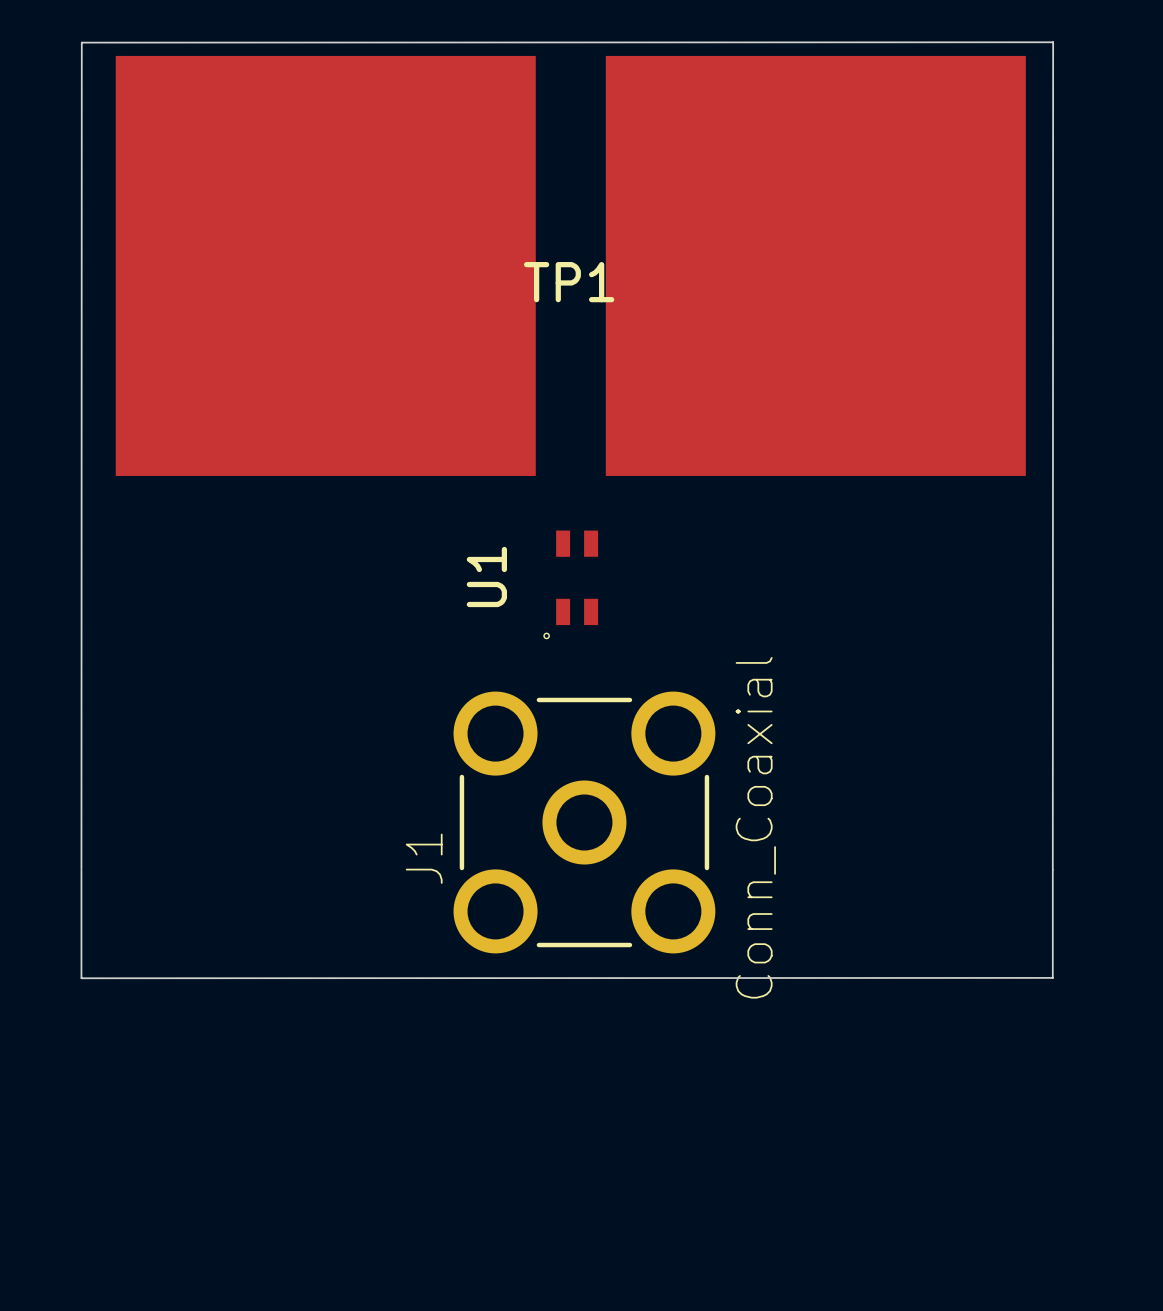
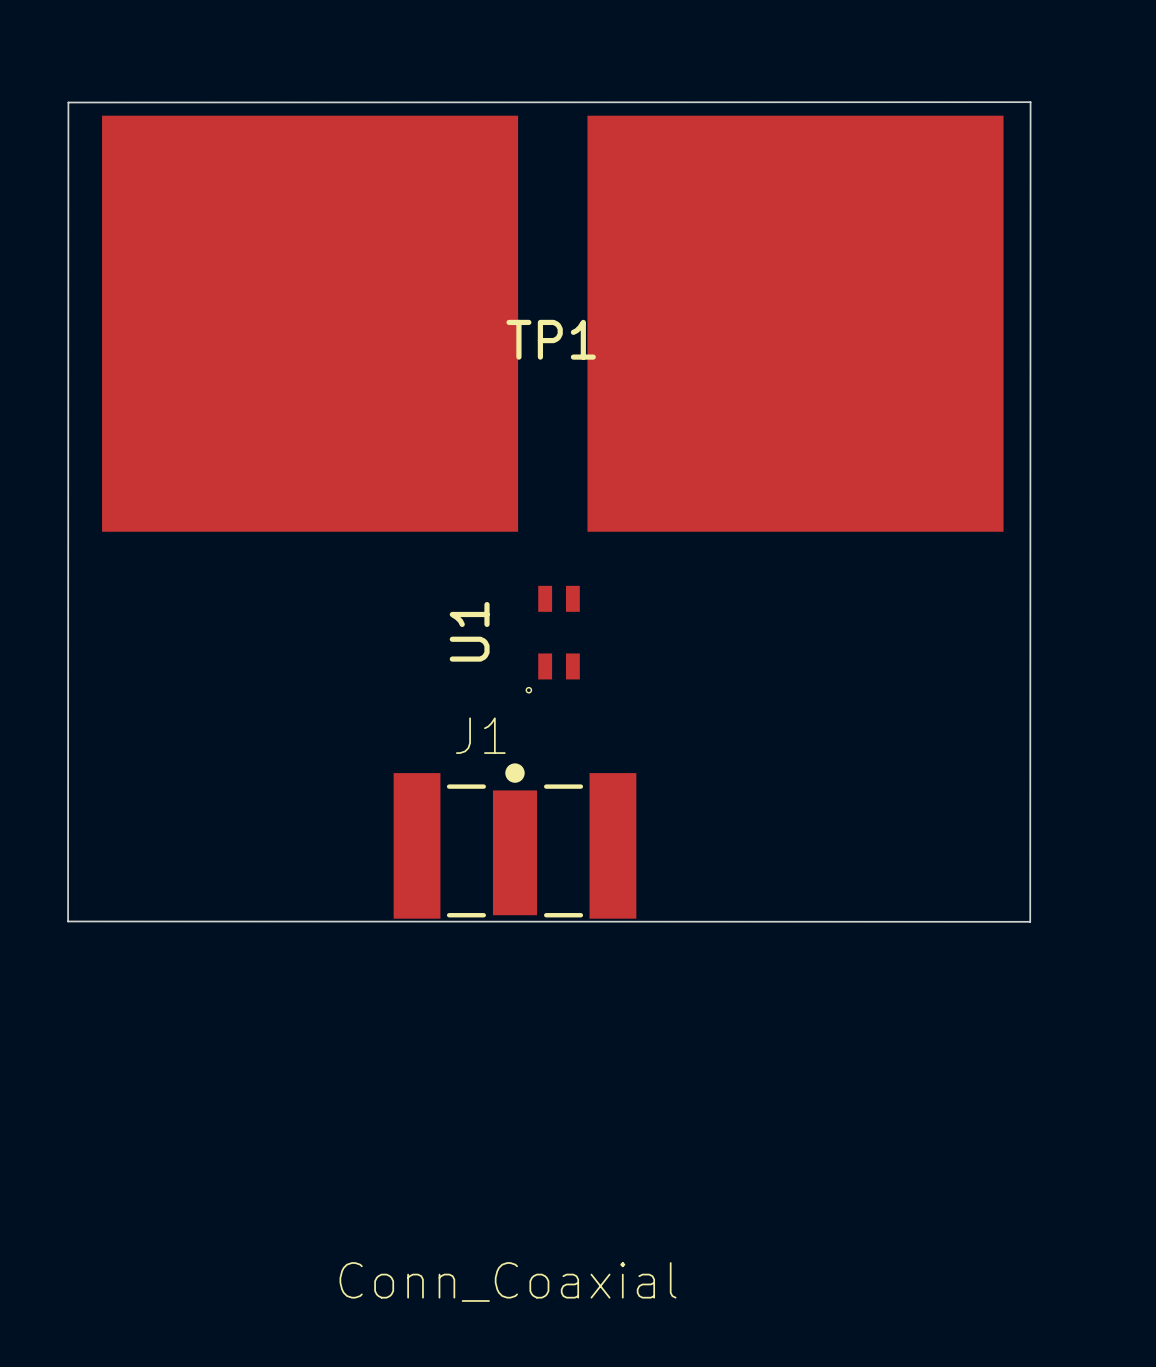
J1 footprint: [453, 691, 716, 954] -> [393, 763, 637, 919]
J1 value position: Conn_Coaxial (755, 827) -> Conn_Coaxial (508, 1281)
J1 name position: J1 (424, 858) -> J1 (480, 735)
board edge: (81, 870) (81, 977) -> none
board edge: (1052, 870) (1052, 977) -> (1030, 921) (68, 921)
board edge: (1053, 977) (81, 978) -> none

